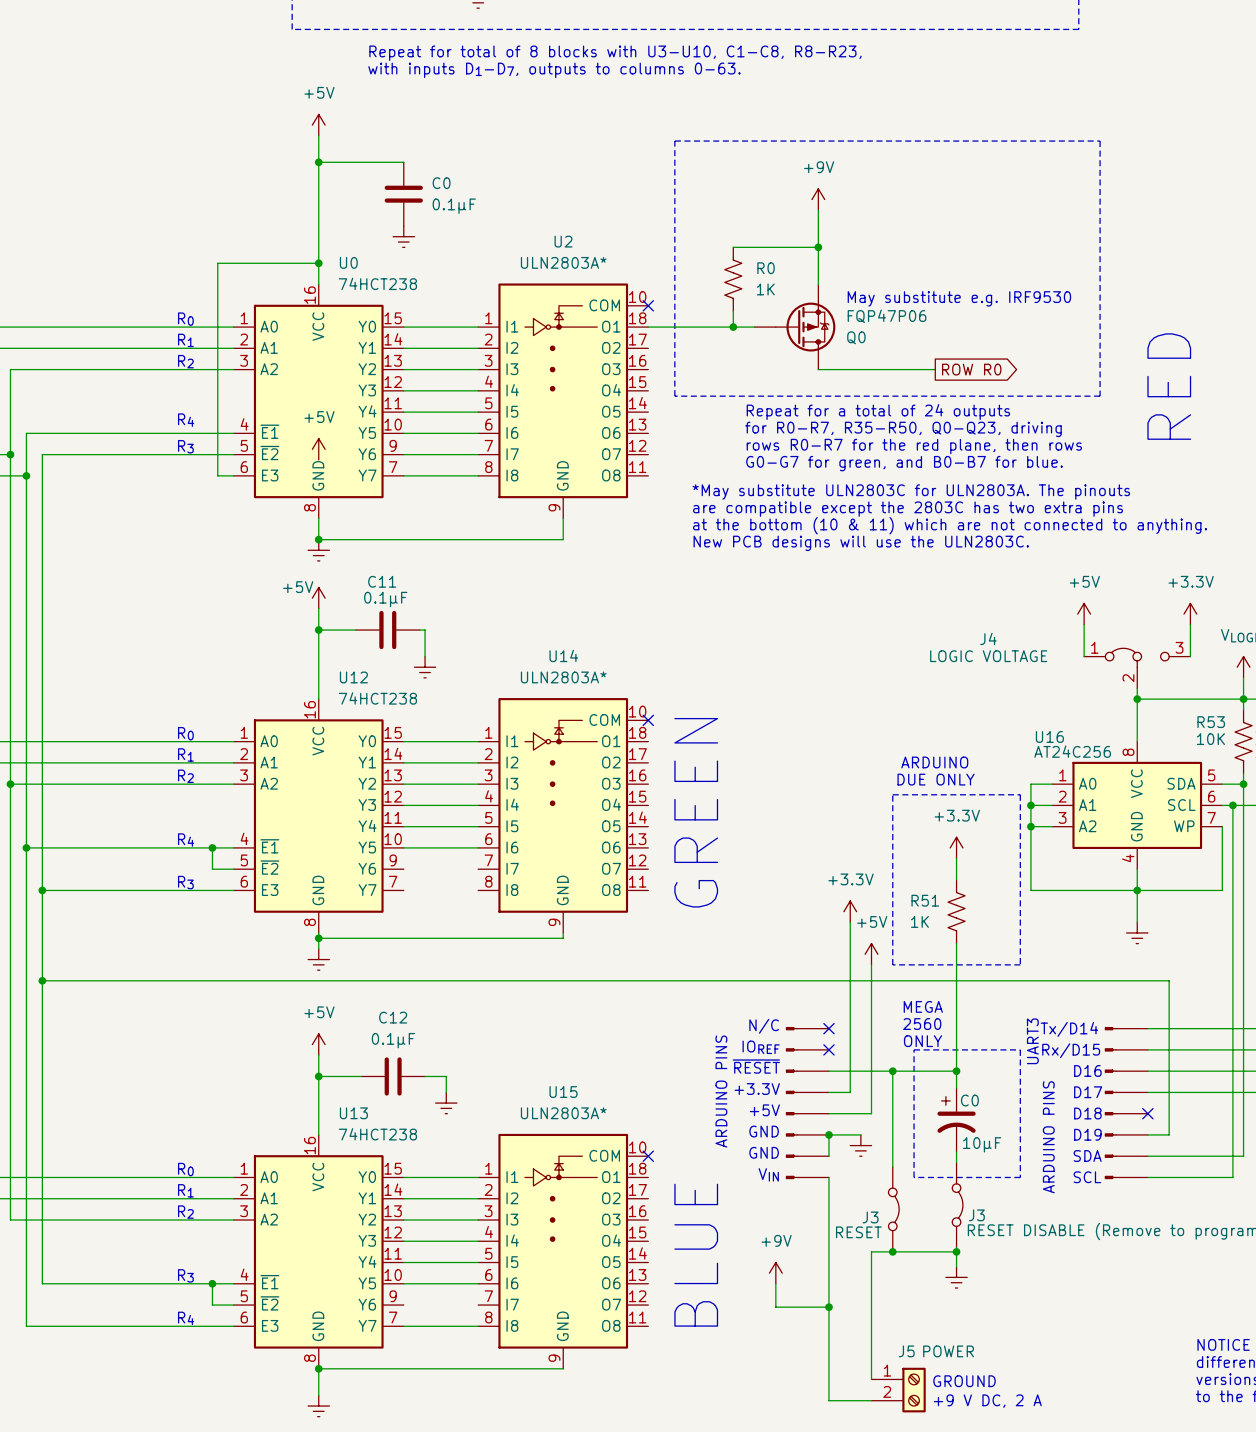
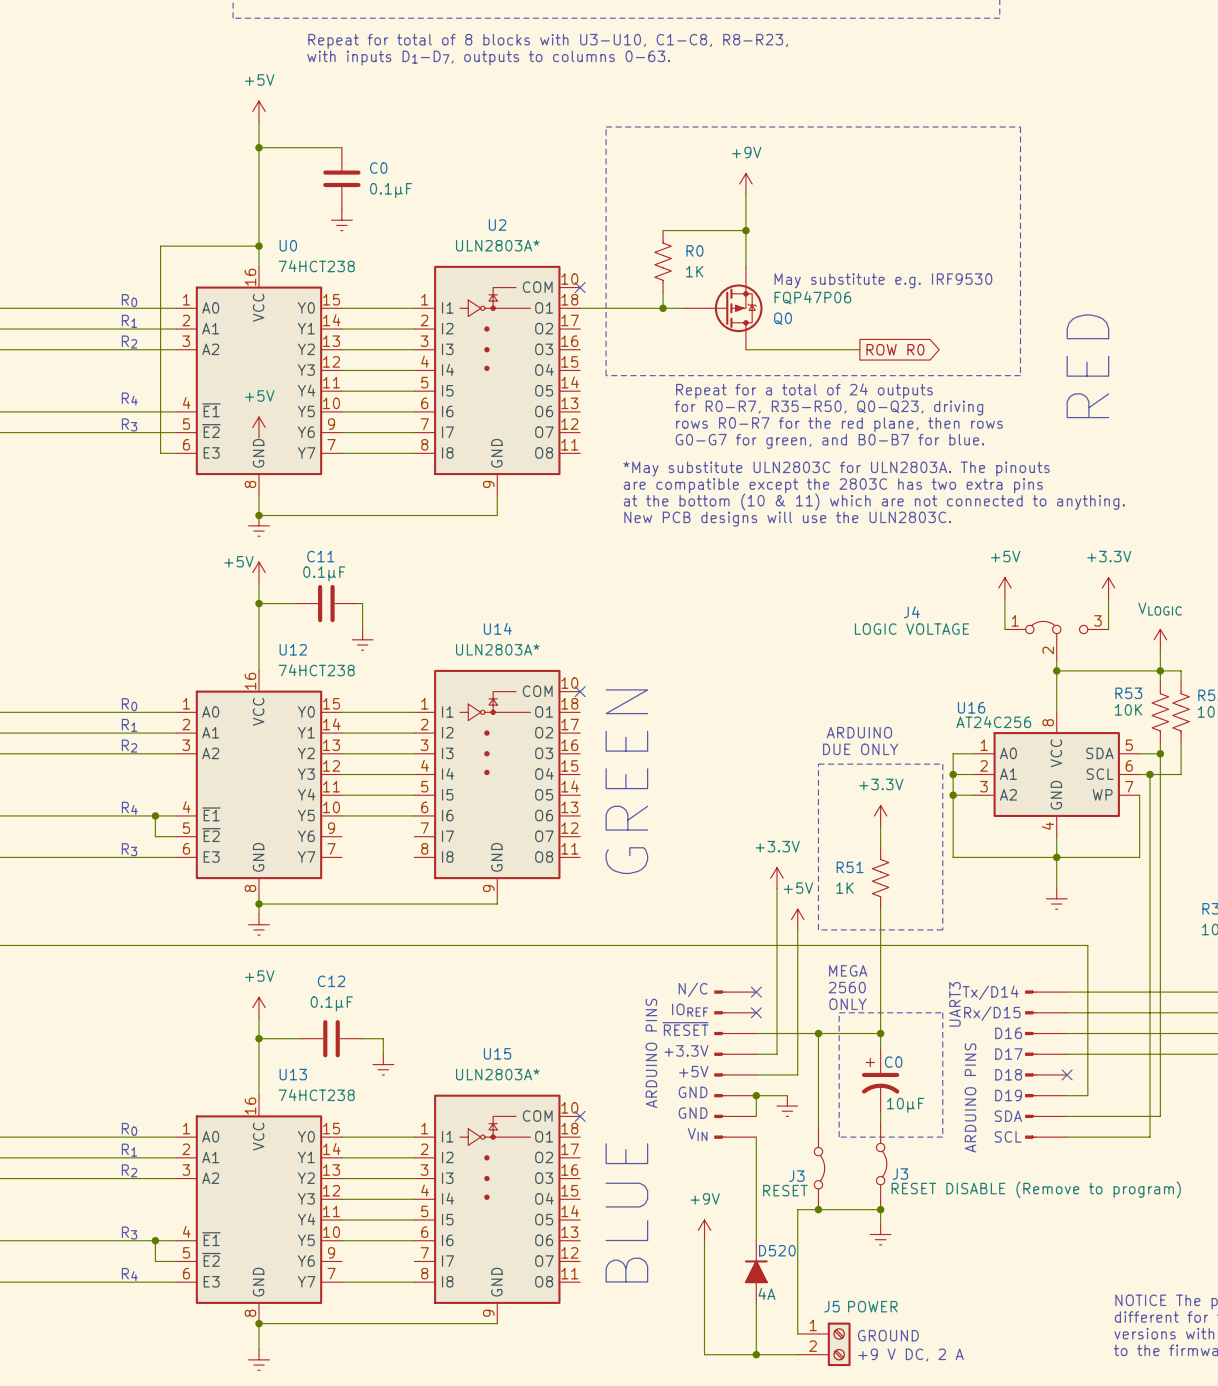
wire: (775, 1307) (828, 1307) -> (704, 1263) (704, 1354) (756, 1354)
junction: (828, 1307) -> none
D520: none -> 4A (756, 1271)
junction: none -> (756, 1354)

